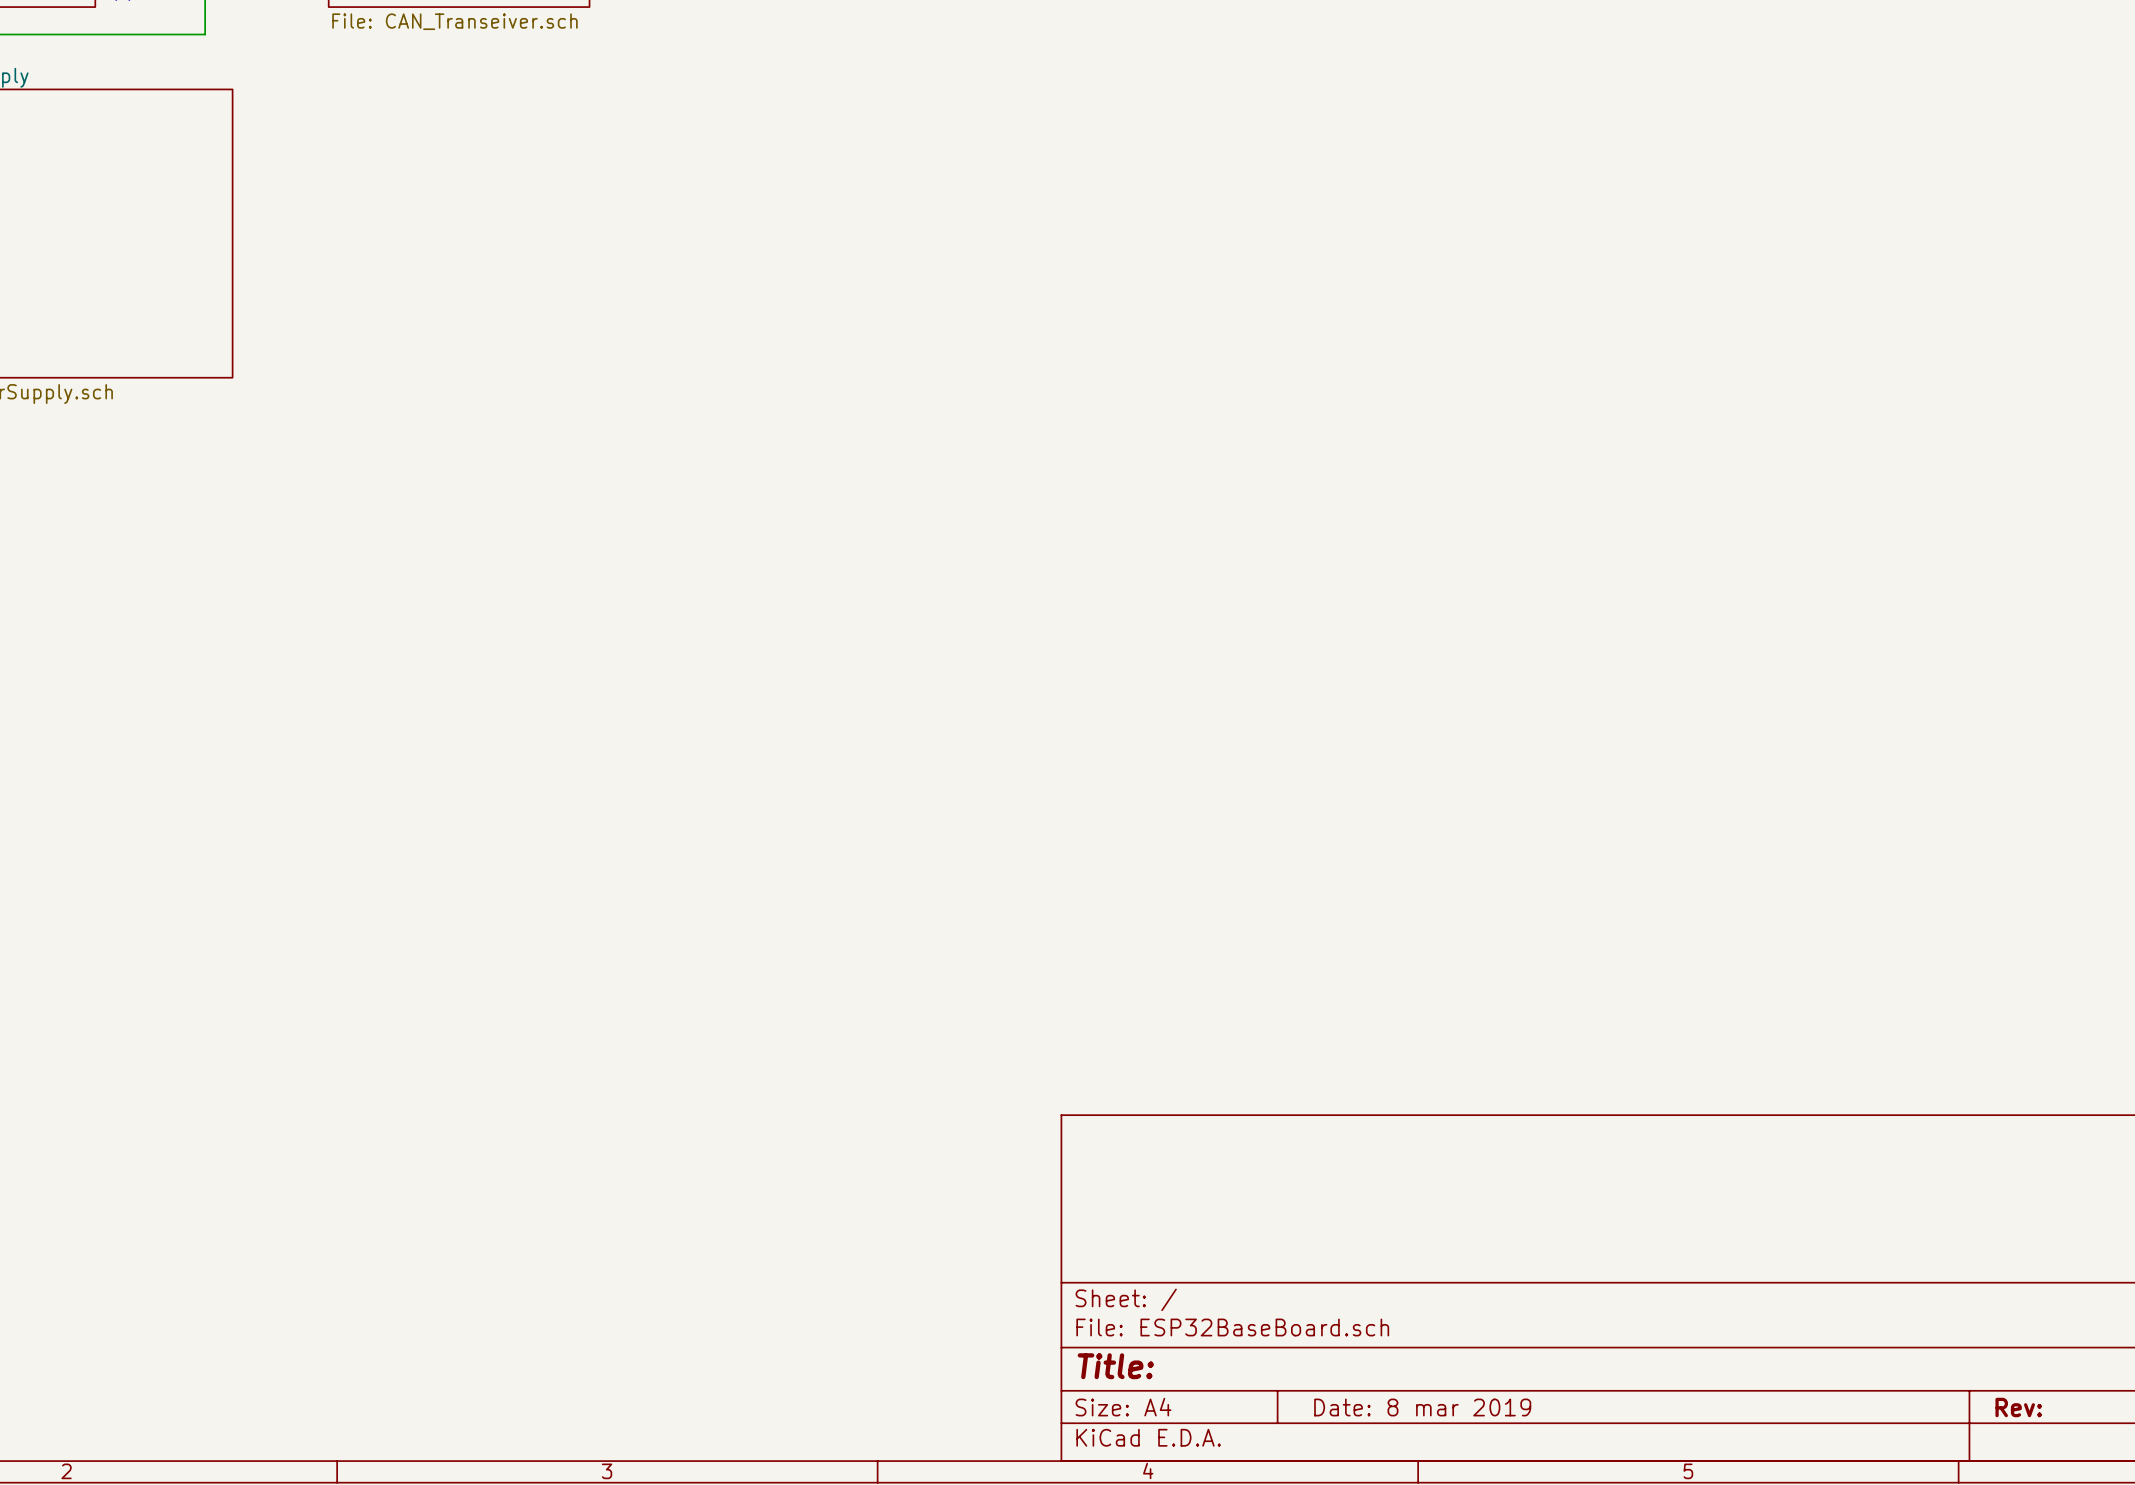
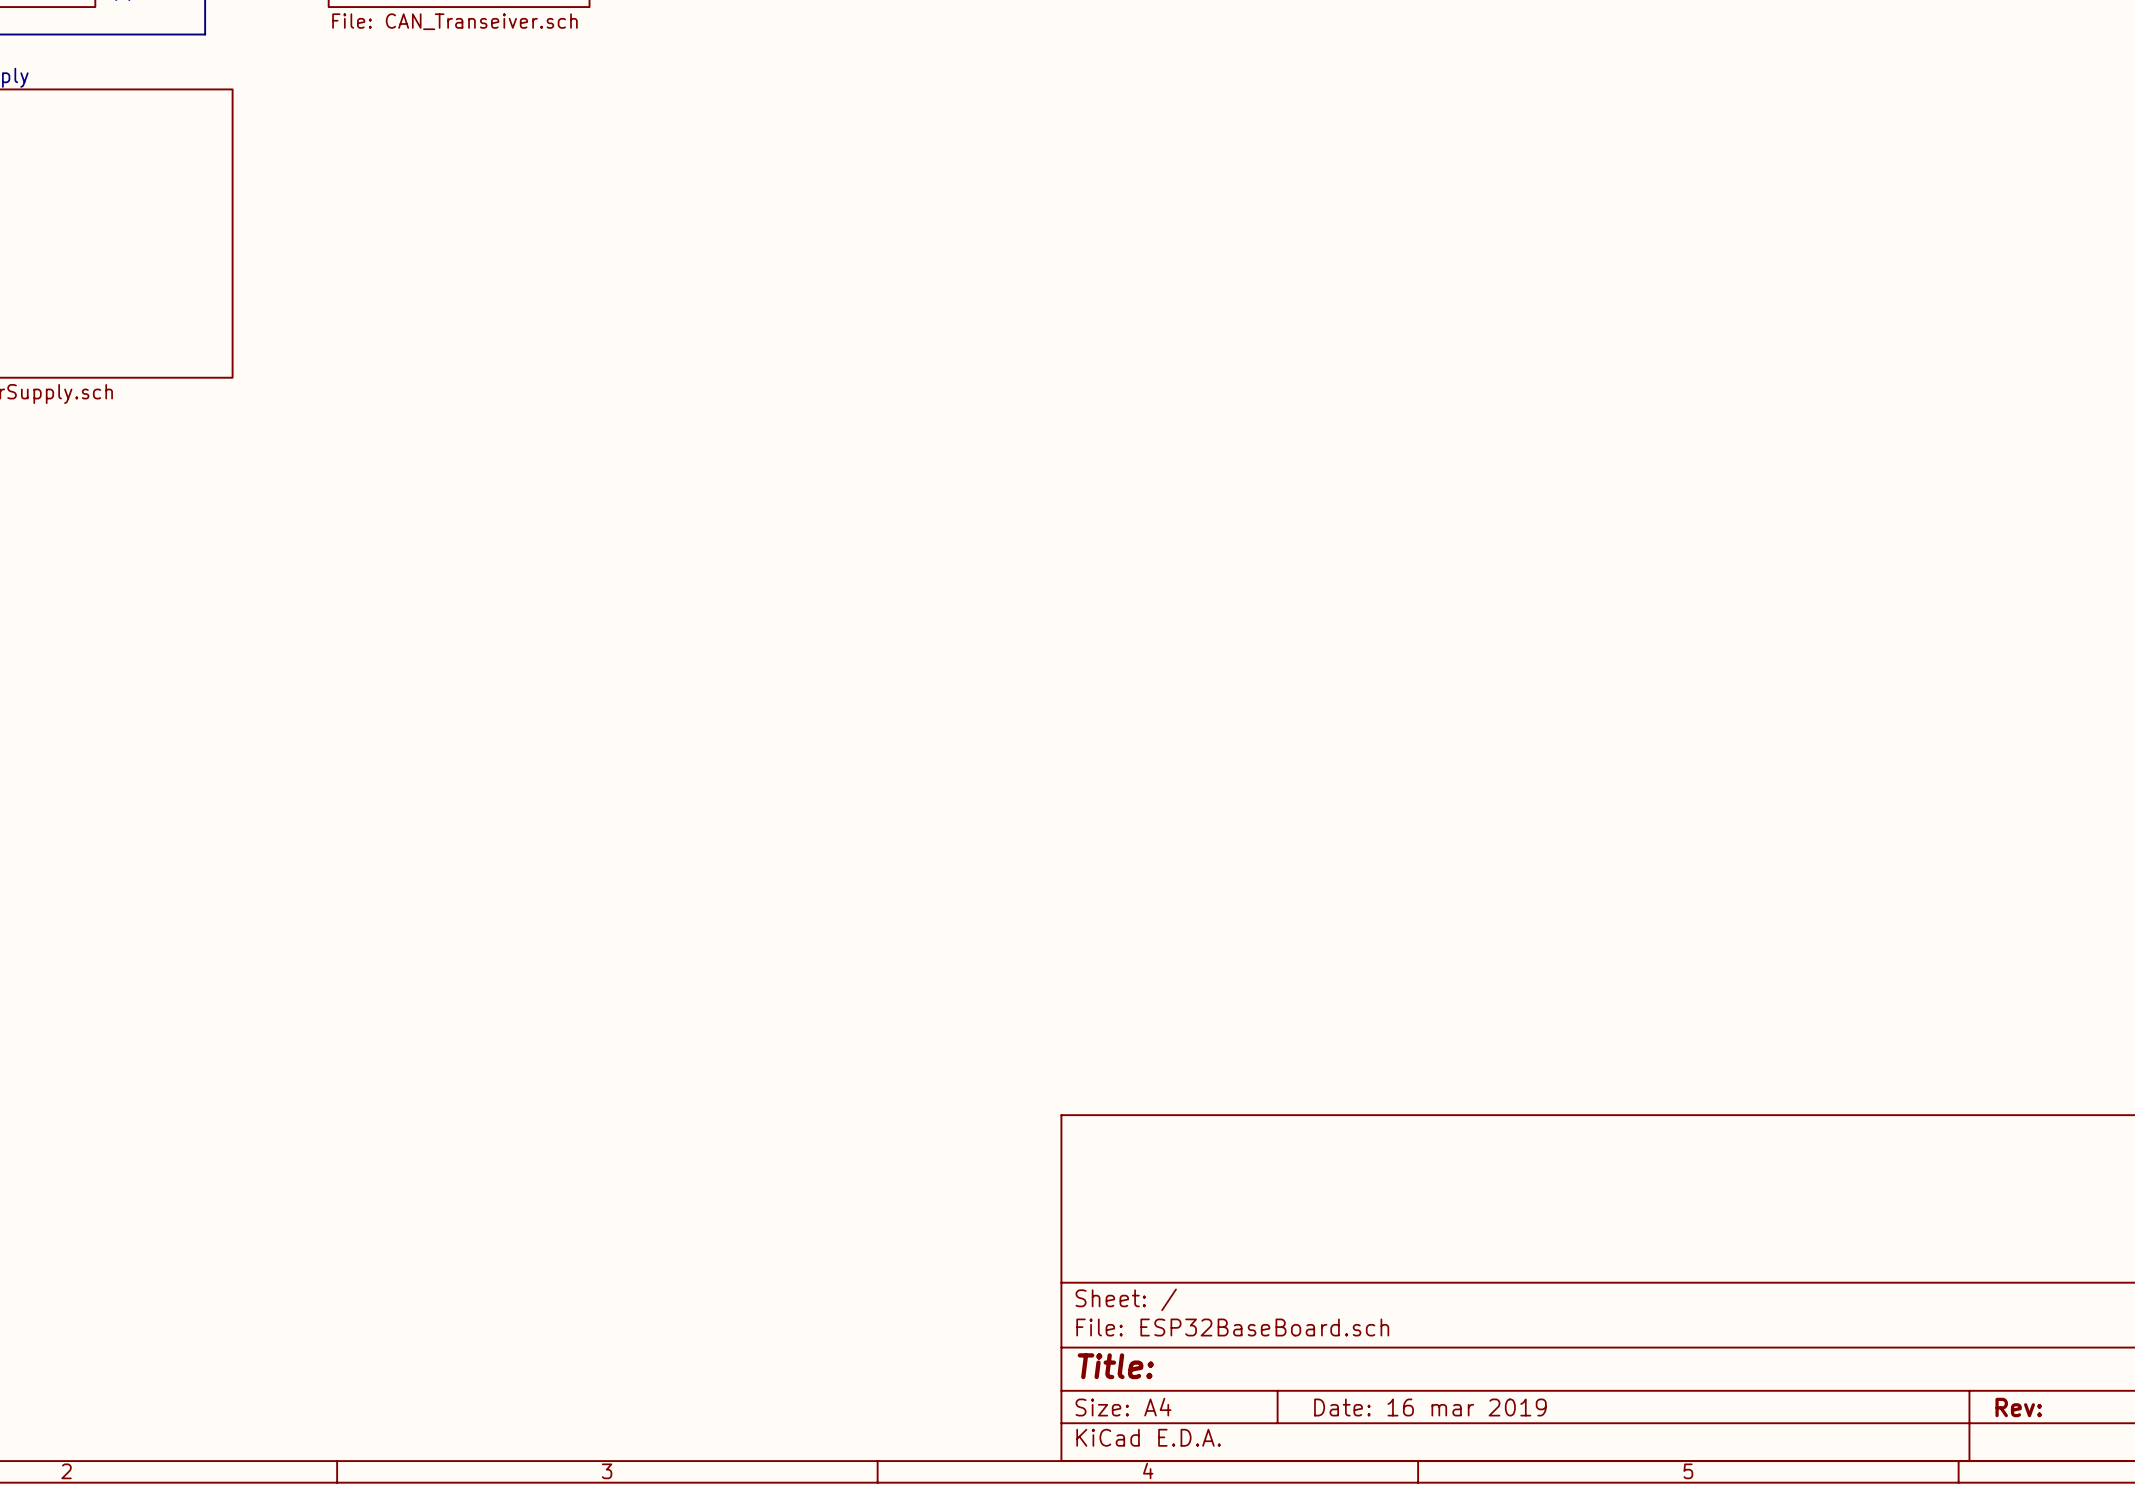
title block: Date: 8 mar 2019 (1422, 1407) -> Date: 16 mar 2019 (1430, 1407)

